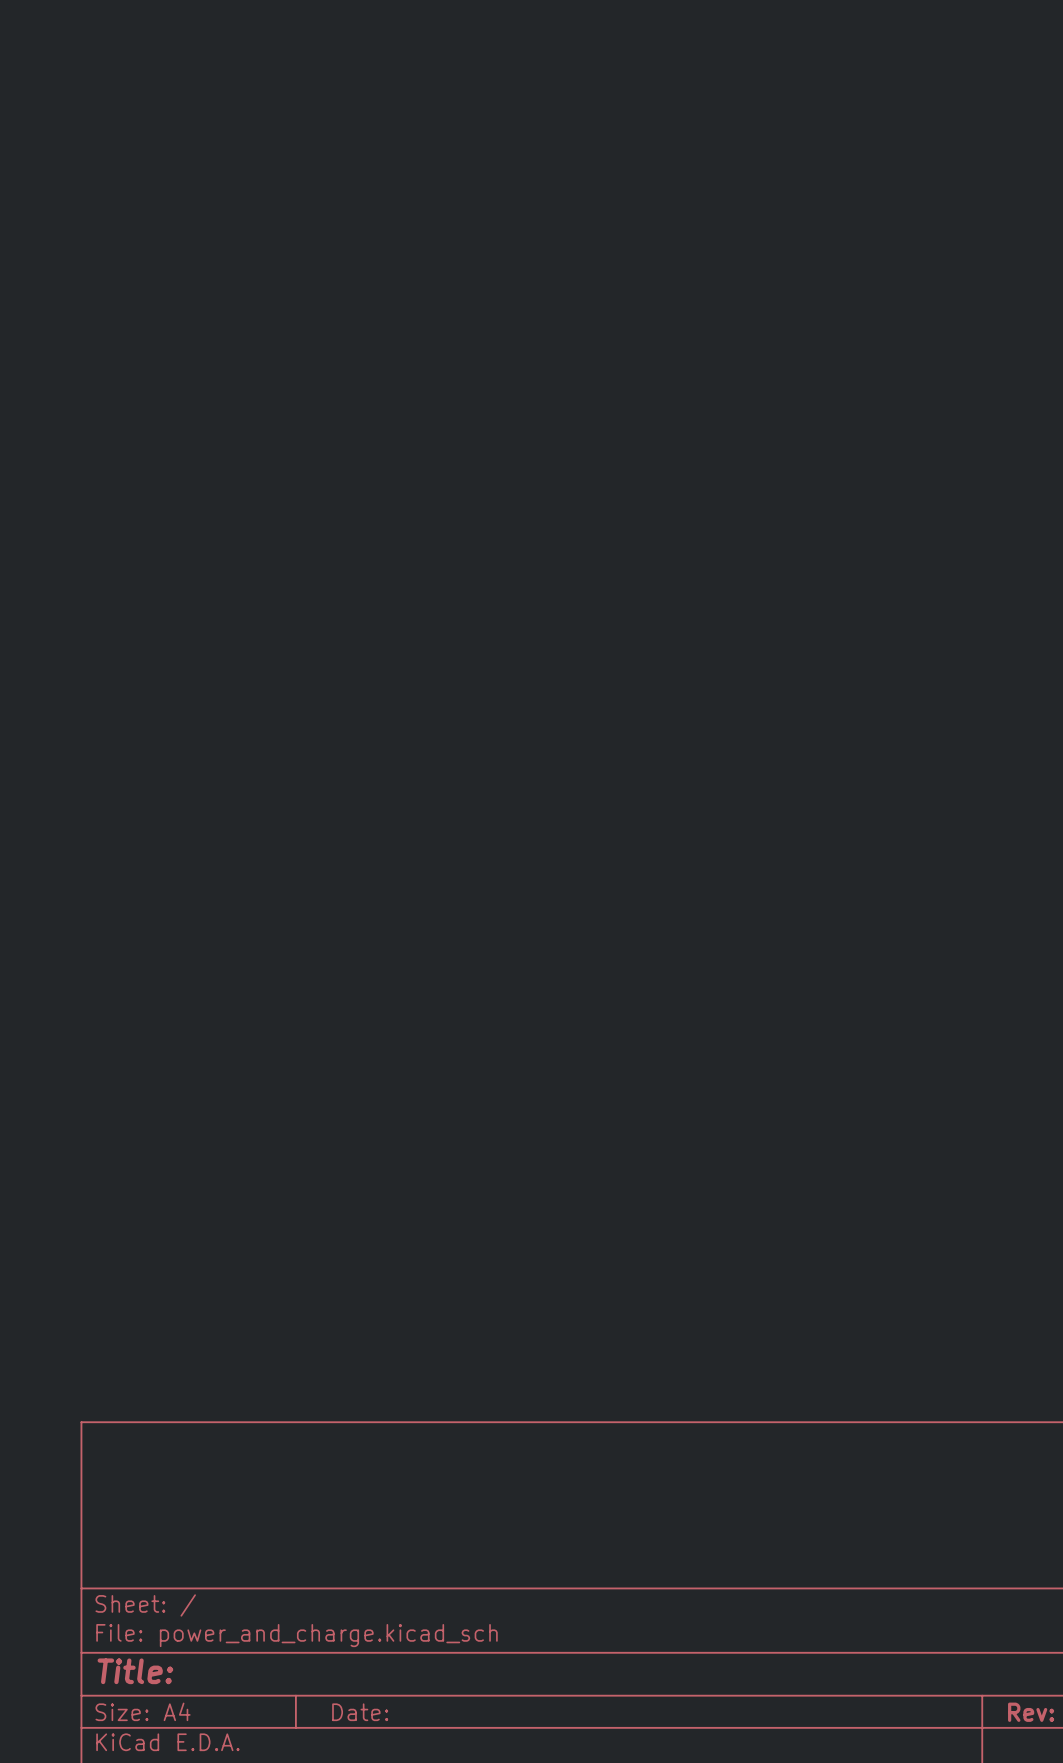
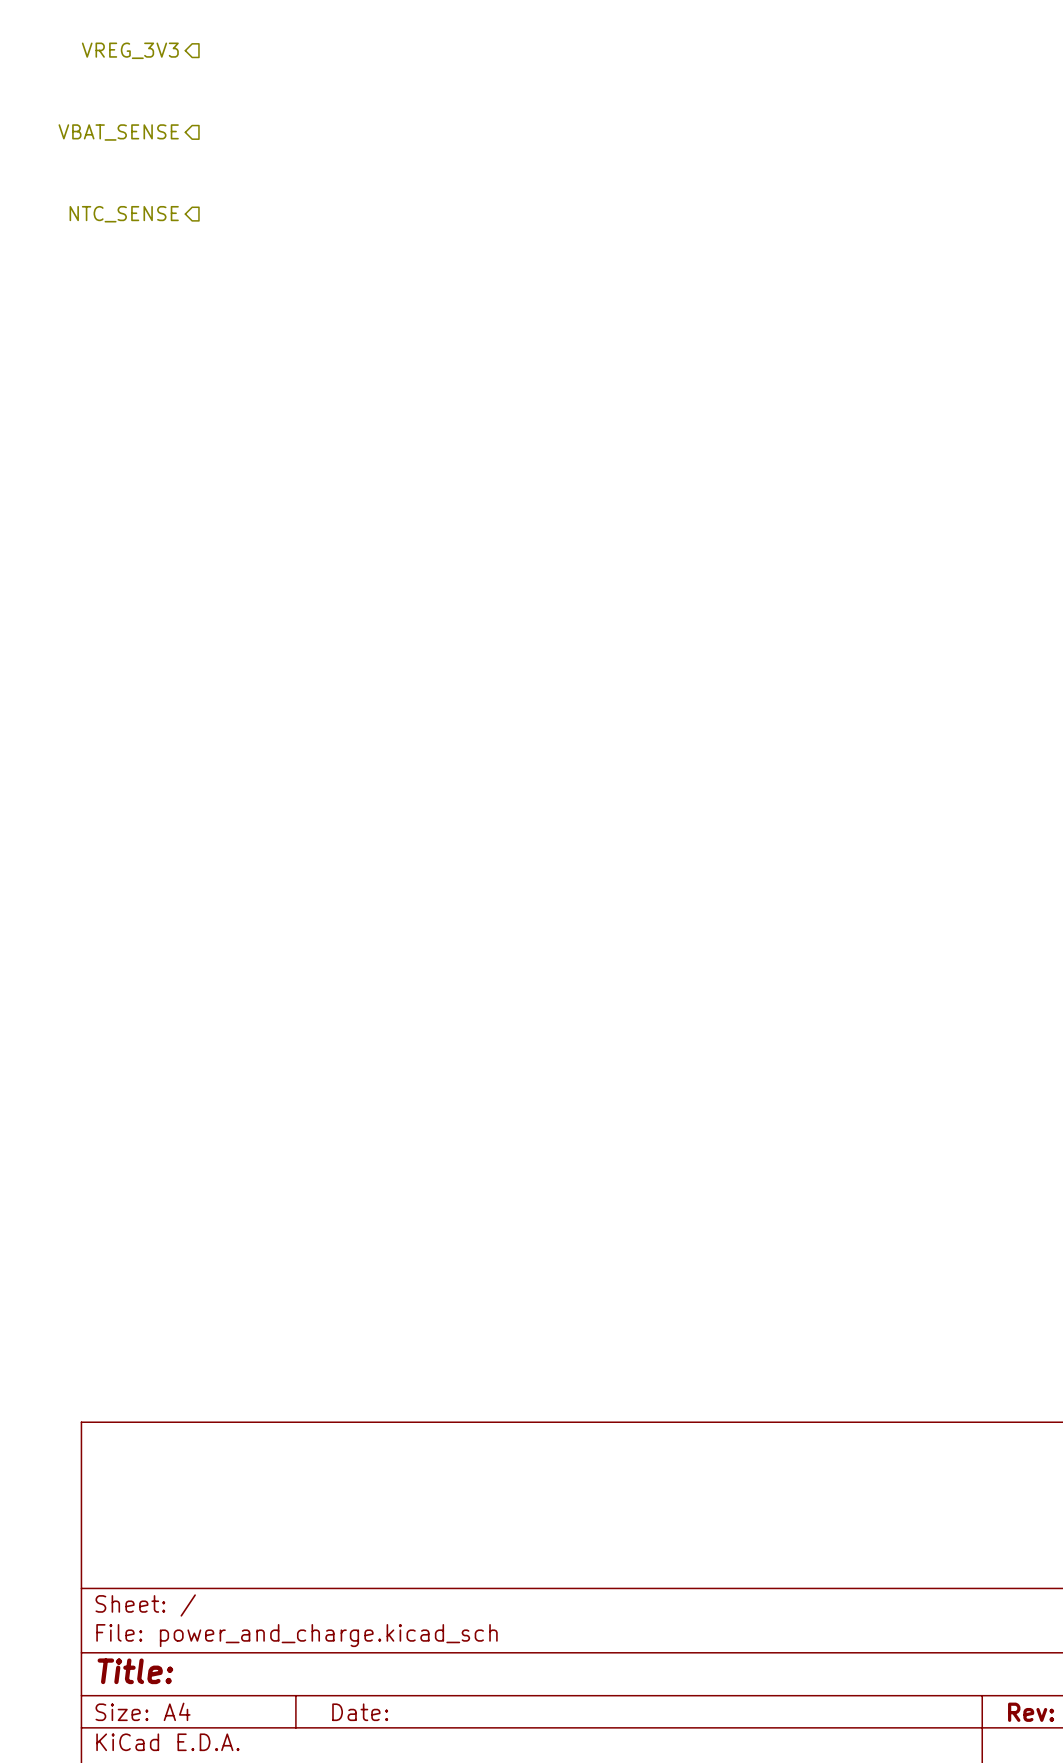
hierarchical label: none -> VREG_3V3 (130, 50)
hierarchical label: none -> VBAT_SENSE (118, 132)
hierarchical label: none -> NTC_SENSE (124, 214)

